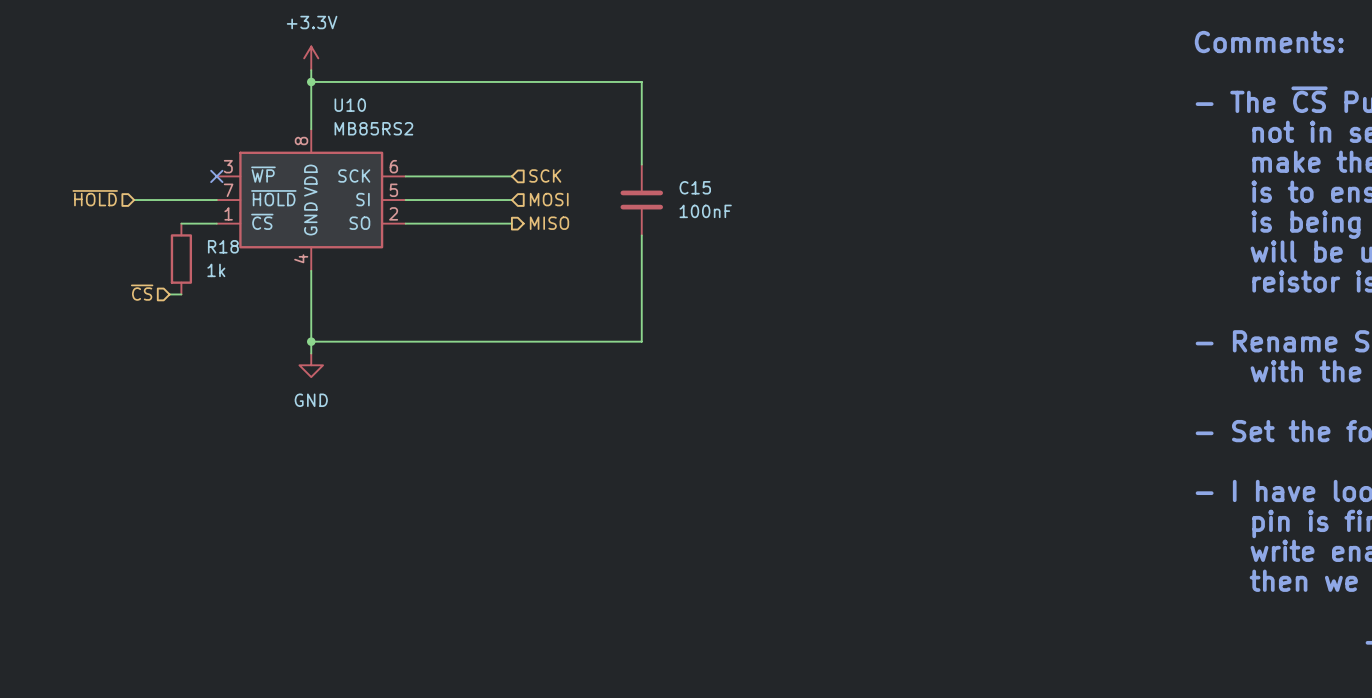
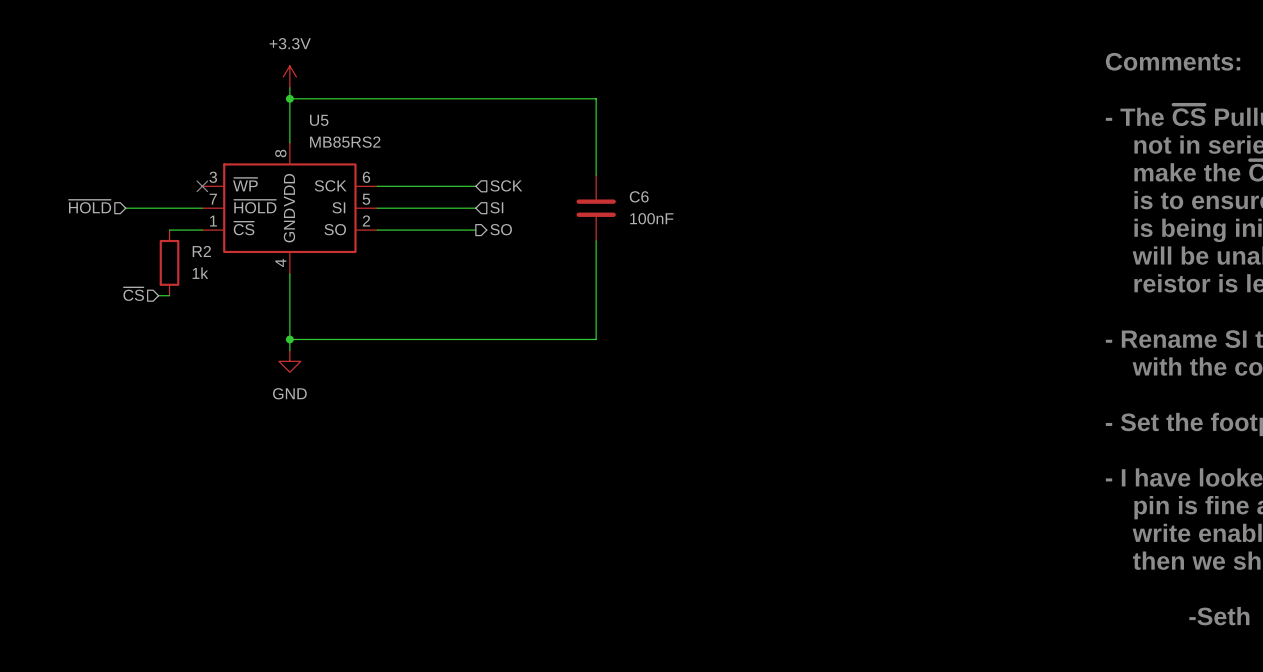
U10 name: U10 (350, 105) -> U5 (319, 120)
C15 name: C15 (695, 187) -> C6 (639, 196)
hierarchical label: MOSI (549, 199) -> SI (496, 207)
hierarchical label: MISO (549, 223) -> SO (501, 229)
R18 name: R18 (223, 246) -> R2 (201, 251)

